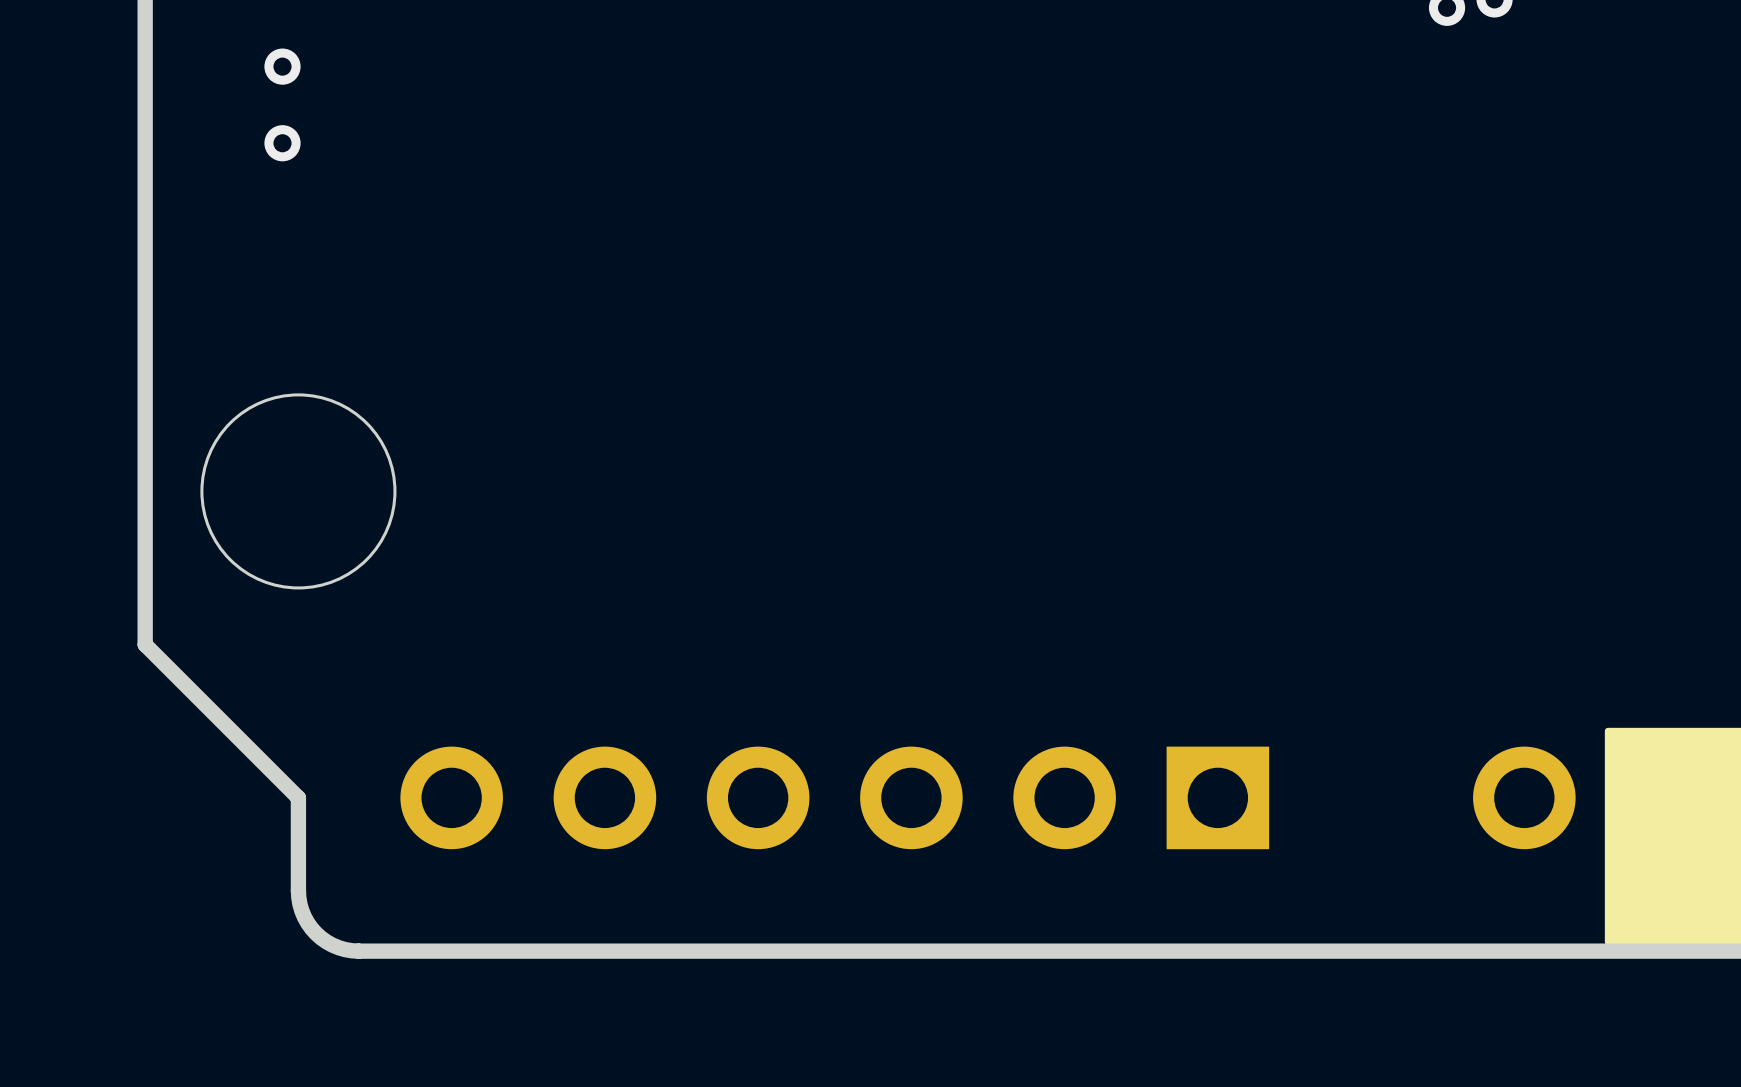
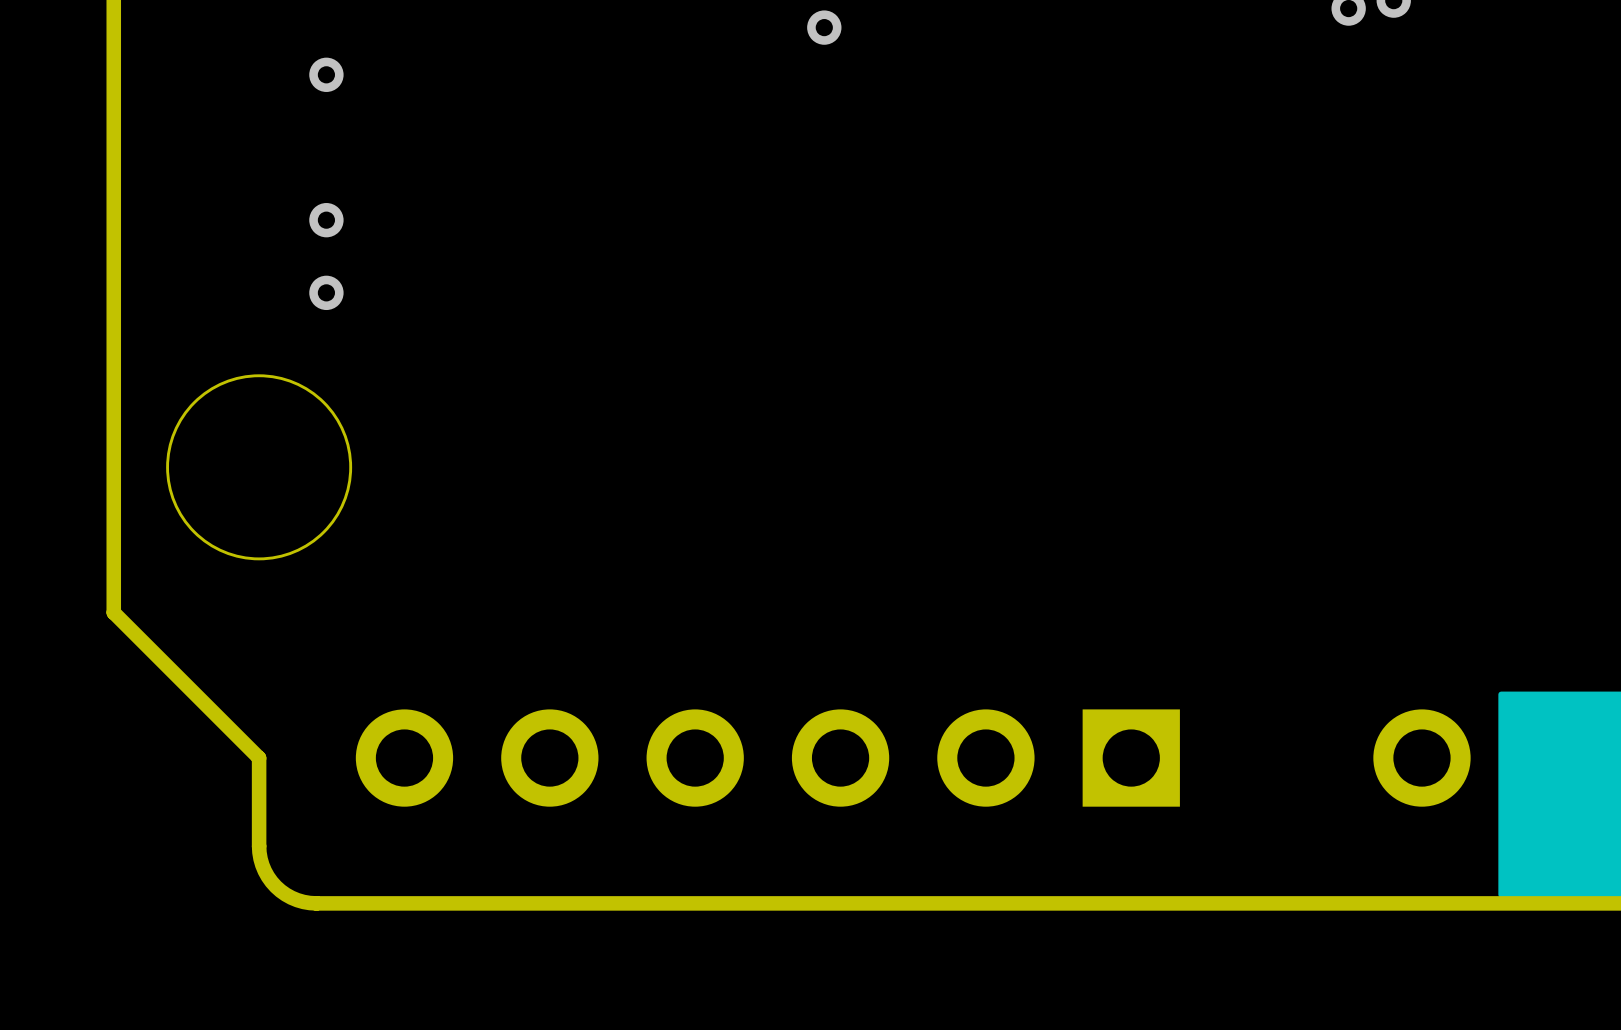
via: none -> (824, 27)
via: (282, 66) -> none
via: none -> (326, 74)
via: (282, 143) -> none
via: none -> (326, 220)
via: none -> (326, 292)

